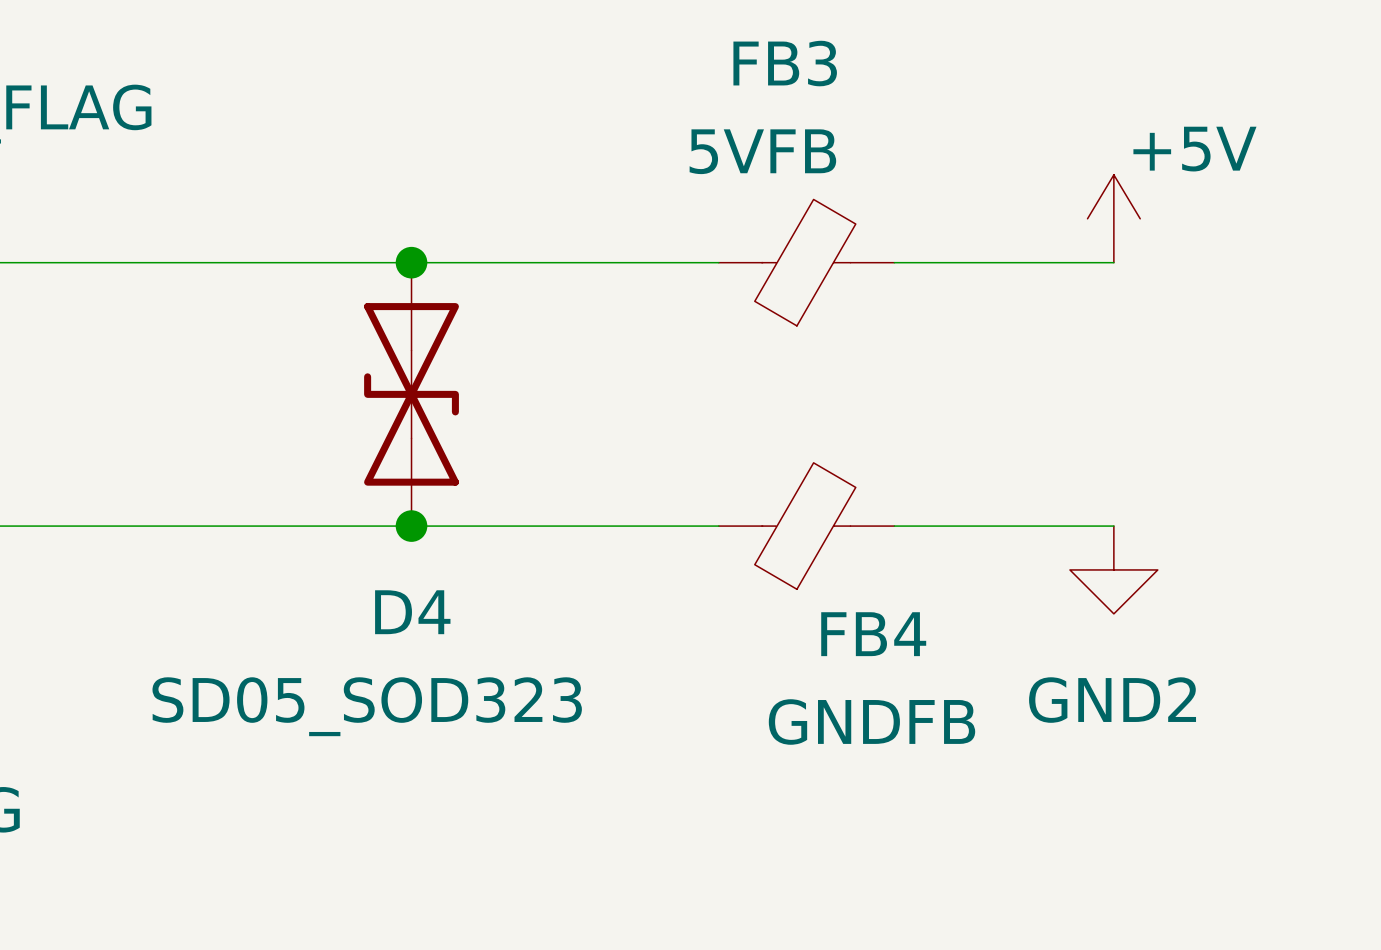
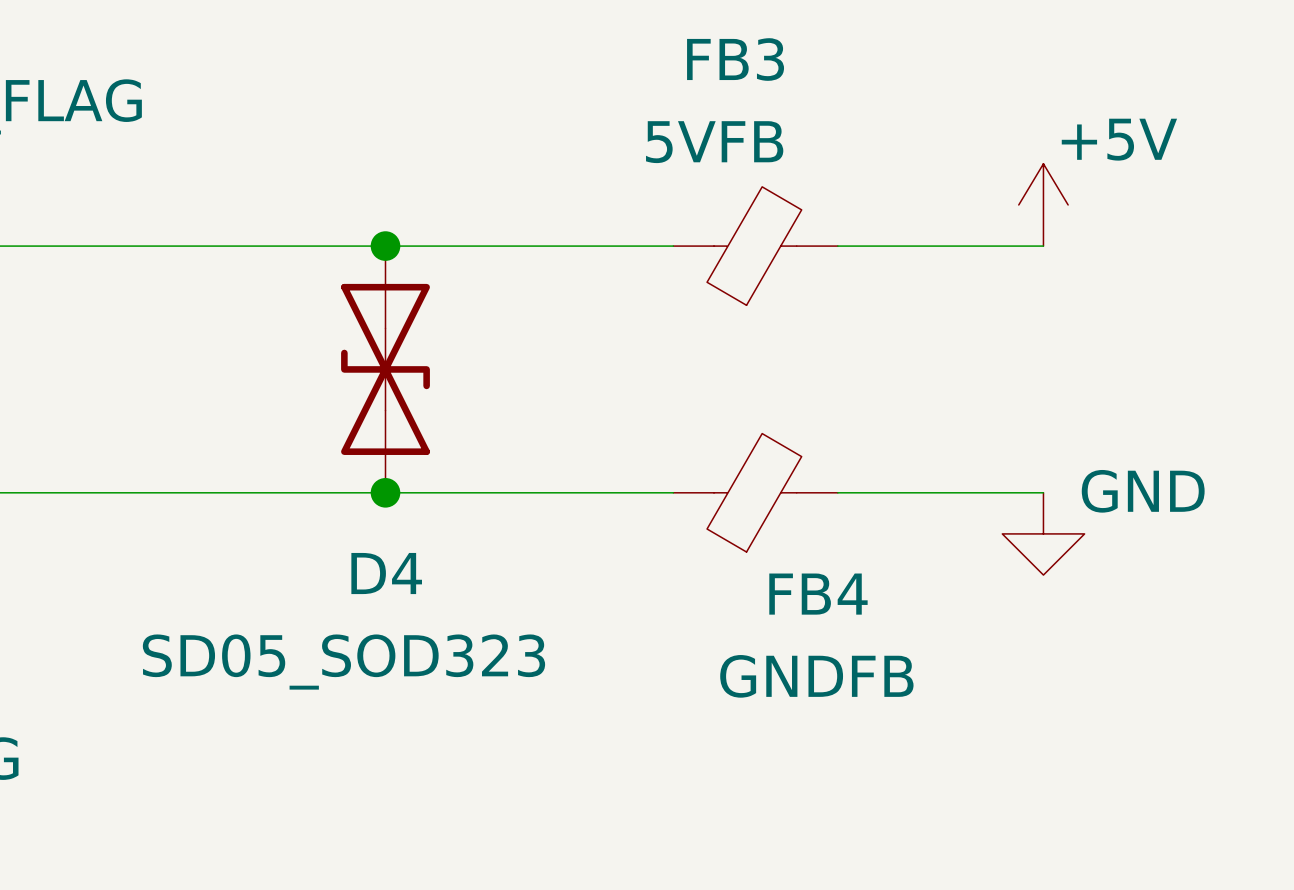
power symbol: GND2 (1113, 569) -> GND (1043, 533)

